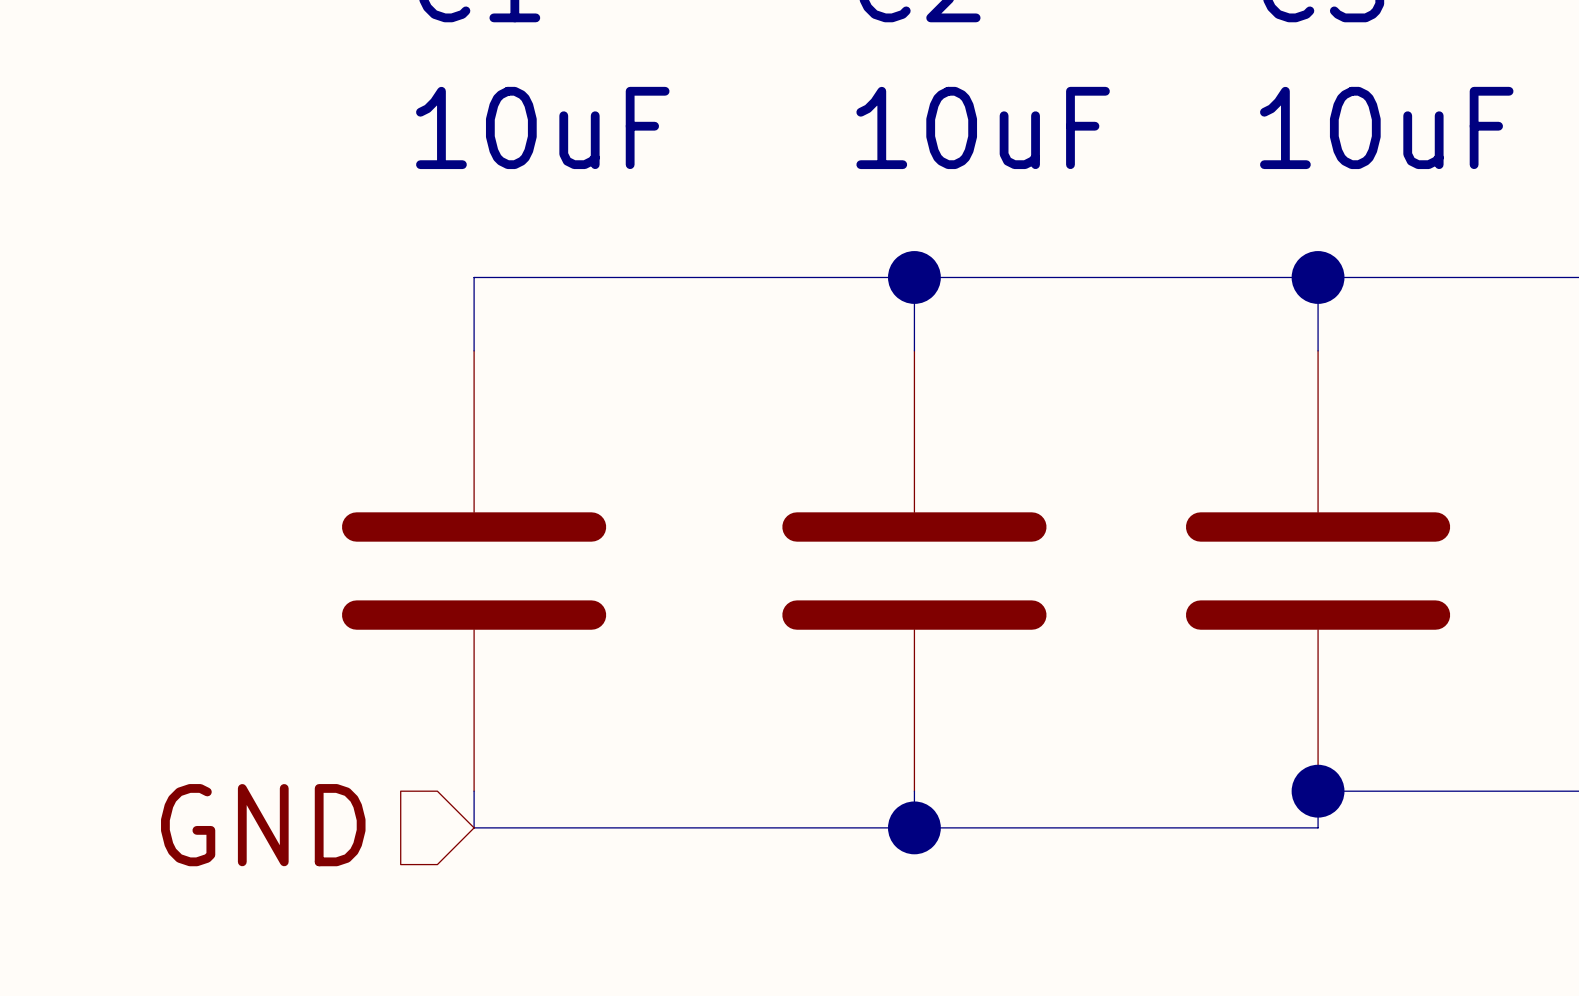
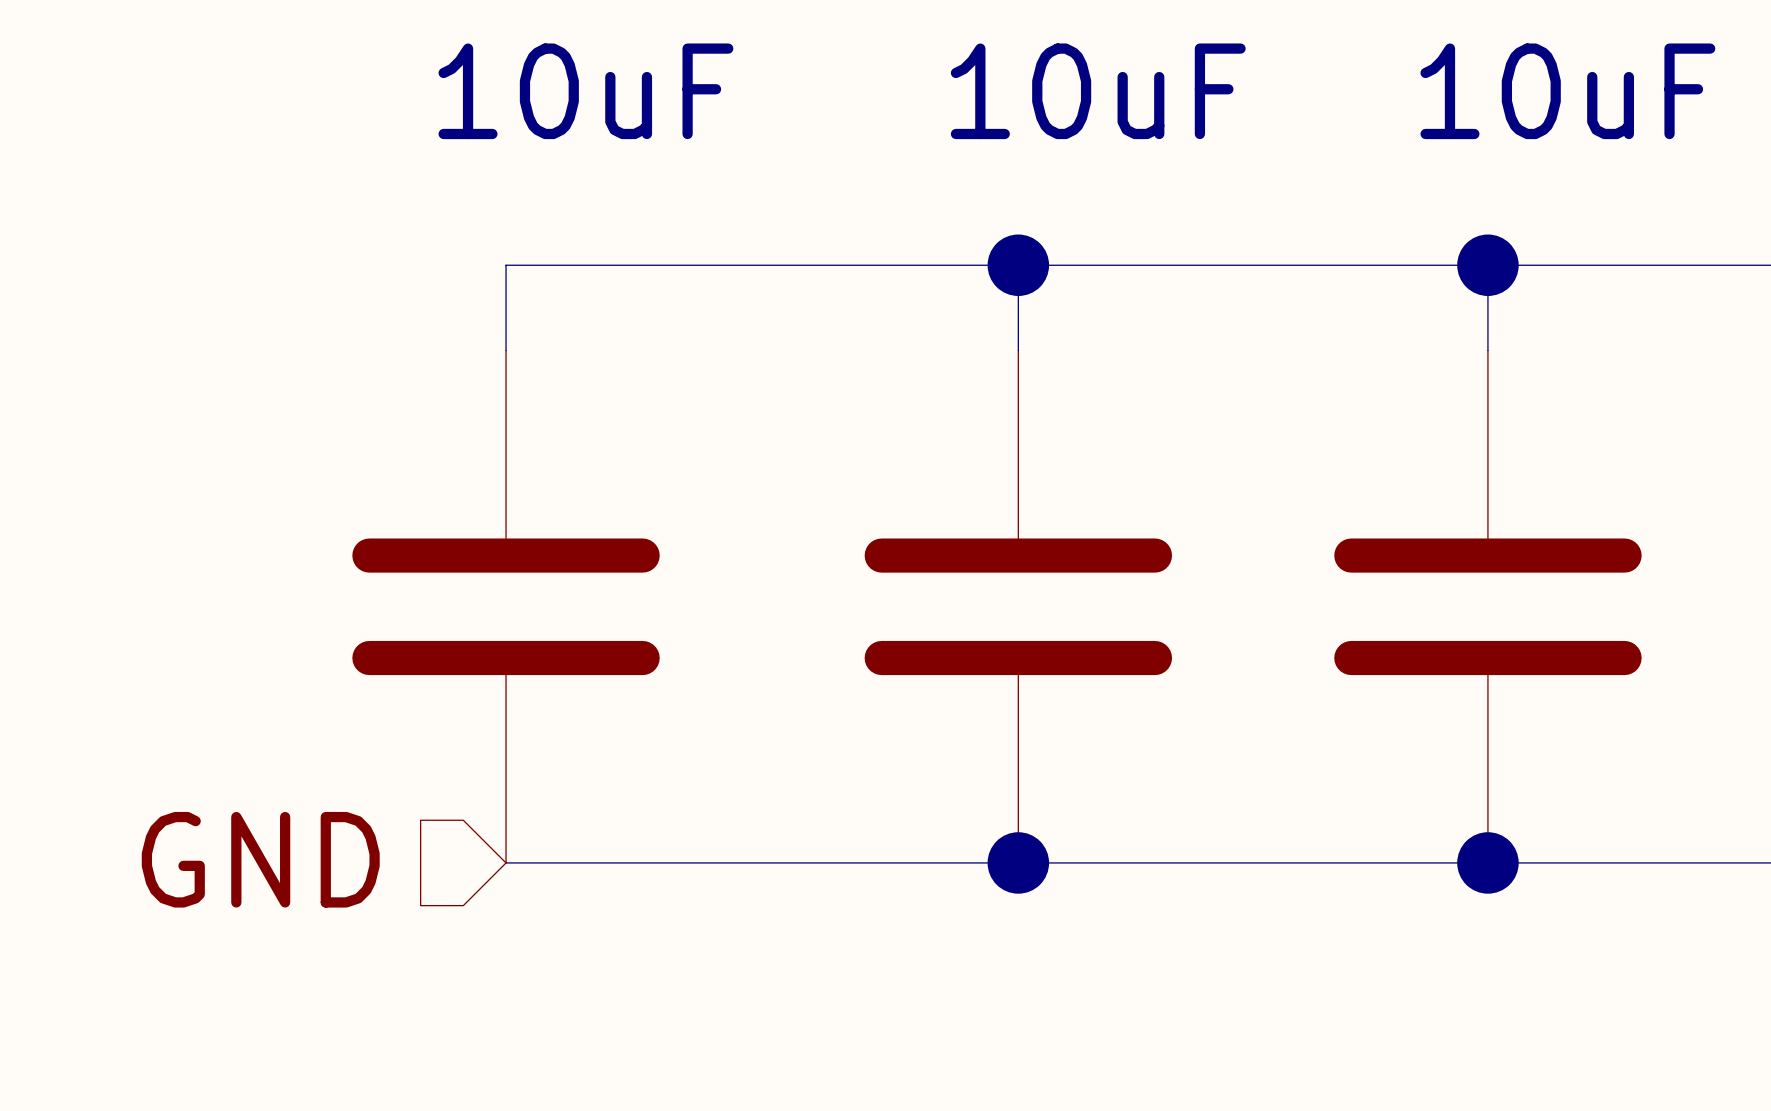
wire: (474, 791) (474, 827) (1318, 827) (1318, 791) -> (506, 862) (1487, 862)
hierarchical label position: GND (263, 825) -> GND (260, 859)
junction position: (914, 827) -> (1018, 862)

